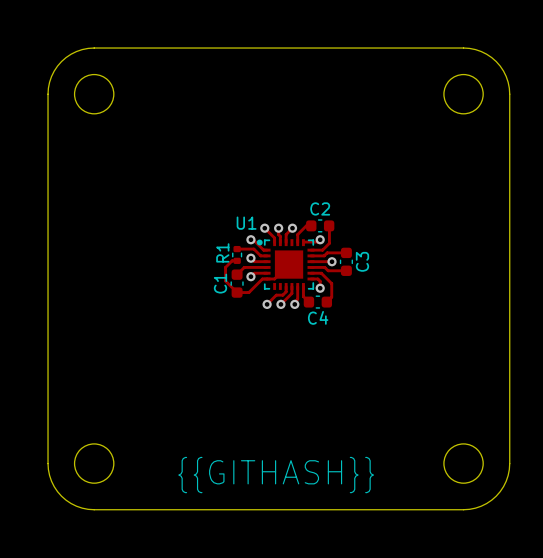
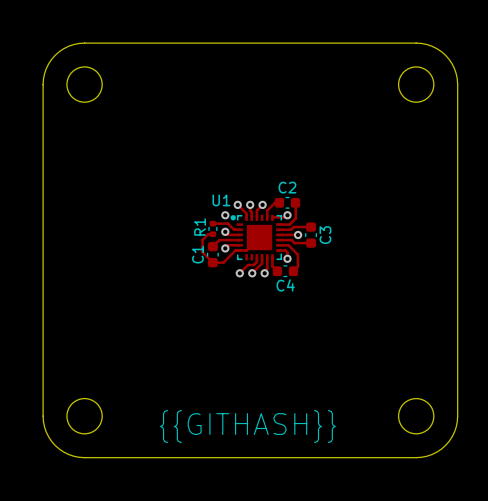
top track: (250, 239) (263, 250) (267, 250) -> none

